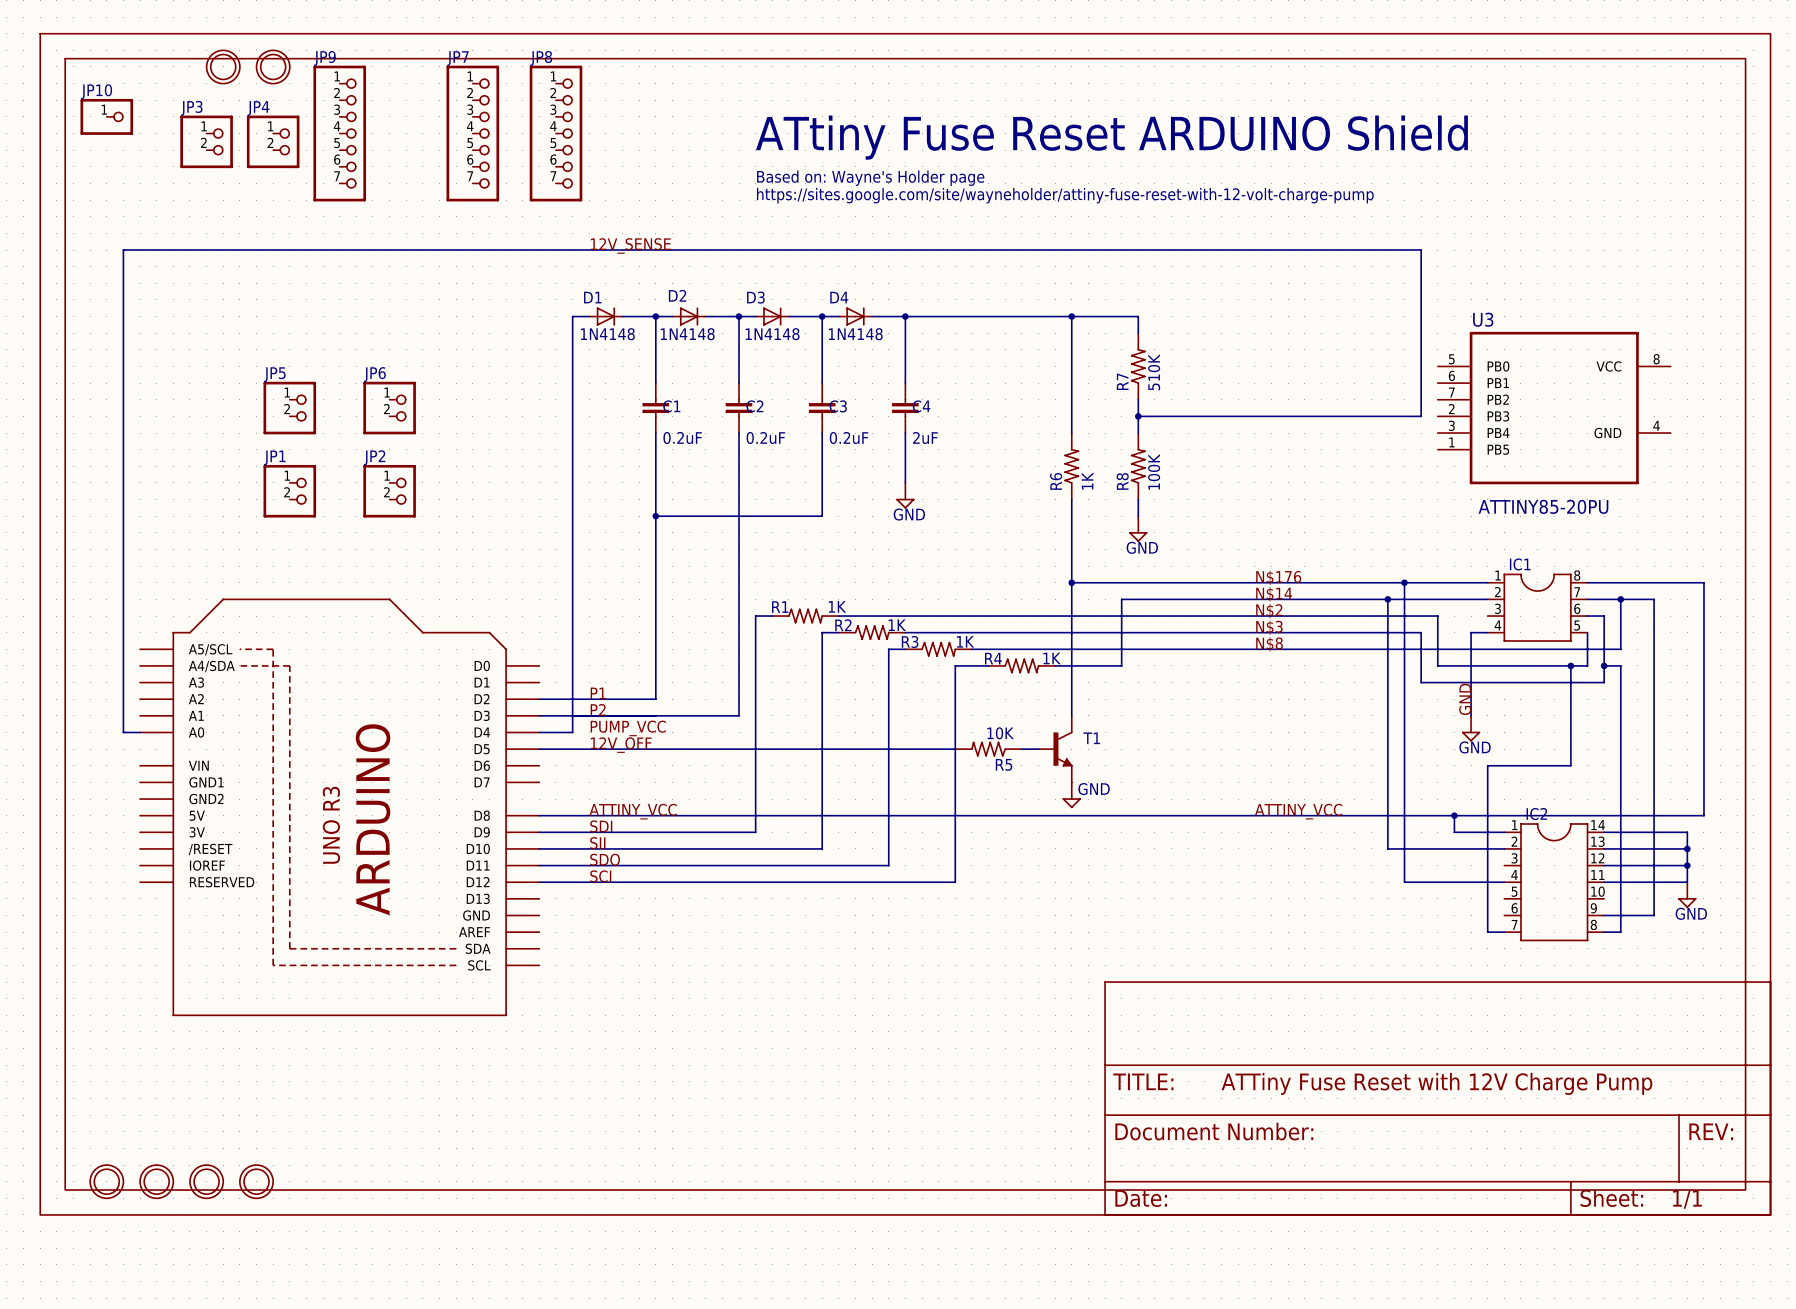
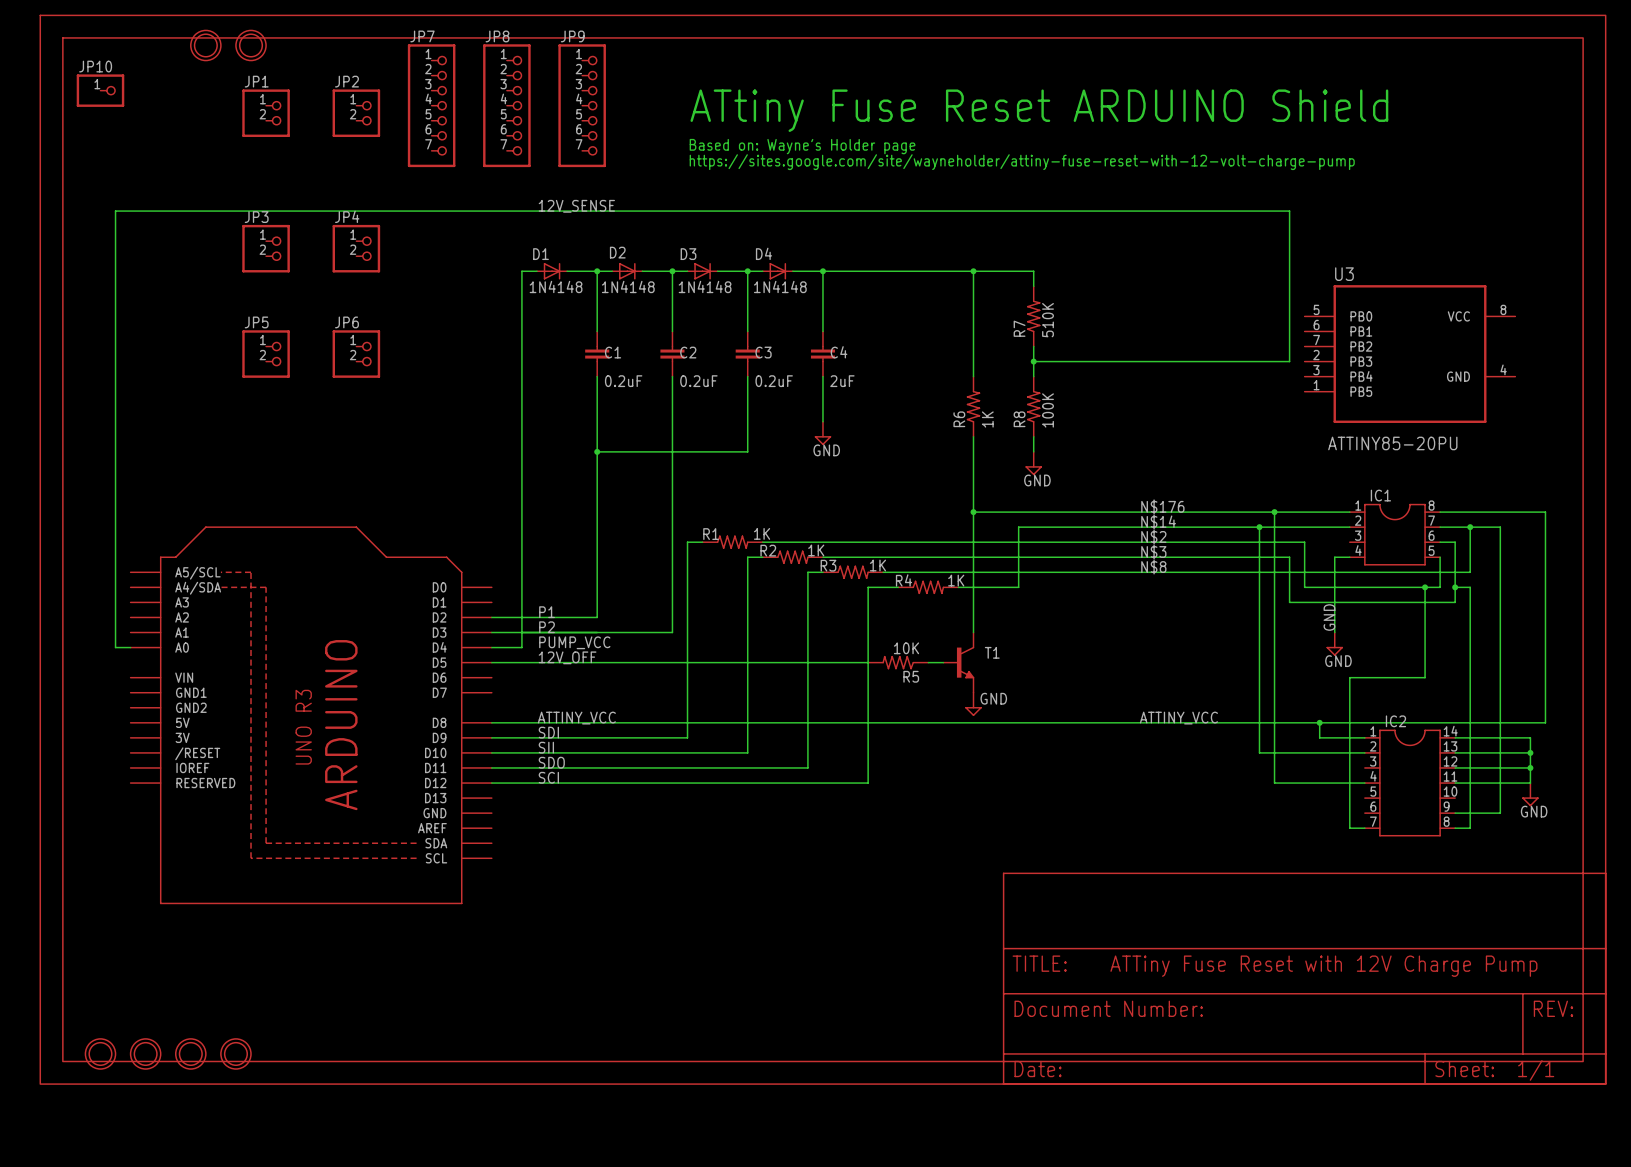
JP9 position: (339, 133) -> (582, 105)
JP3 position: (206, 141) -> (266, 248)
JP4 position: (273, 141) -> (356, 248)
JP1 position: (289, 491) -> (266, 113)
JP2 position: (389, 491) -> (356, 113)

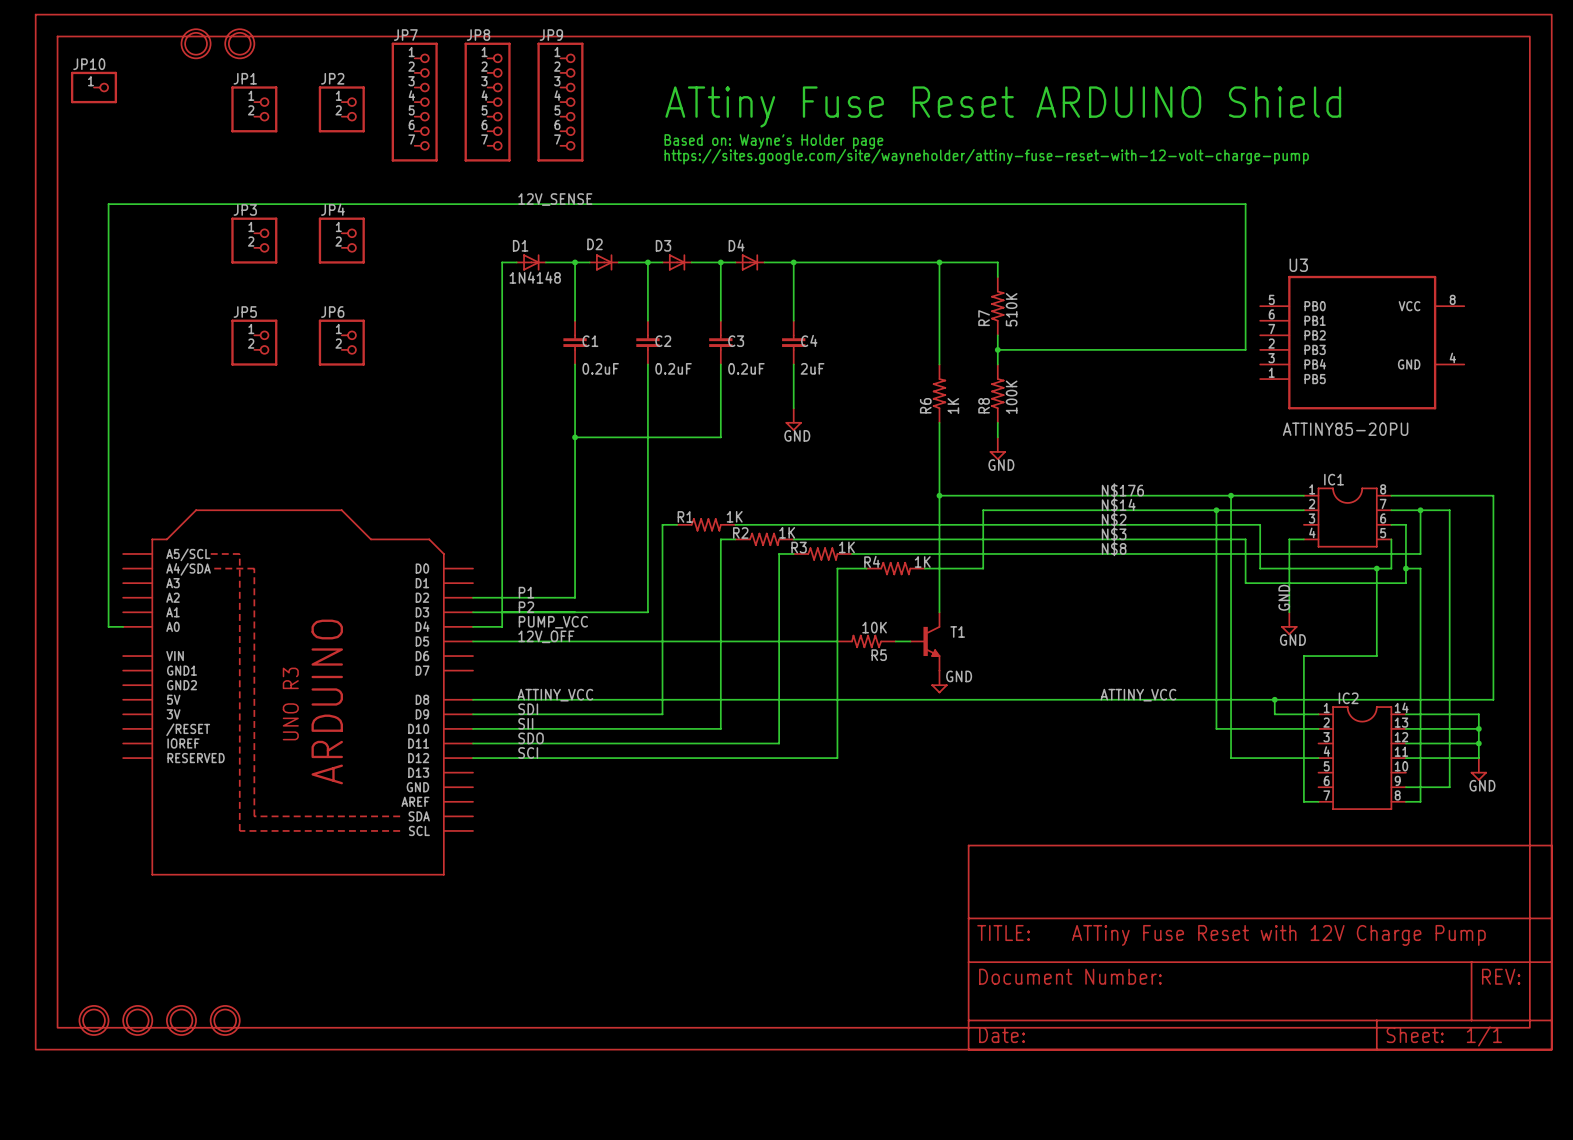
D2 value: 1N4148 (628, 286) -> none
D3 value: 1N4148 (705, 286) -> none
D4 value: 1N4148 (780, 286) -> none

